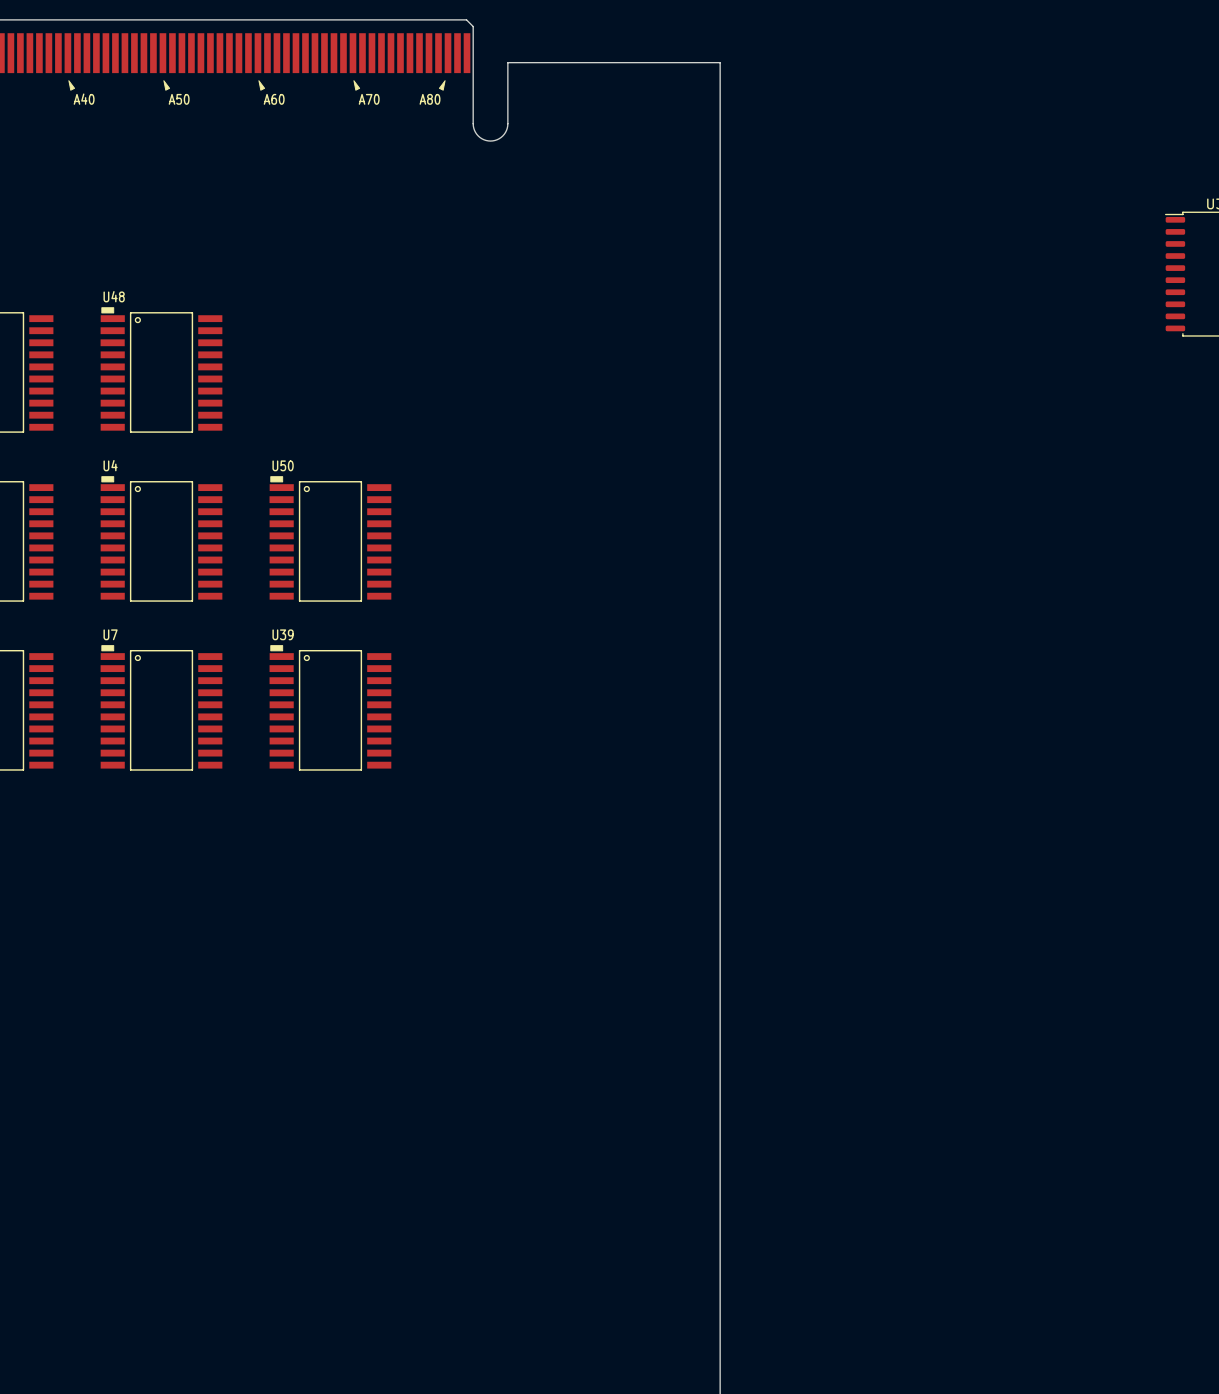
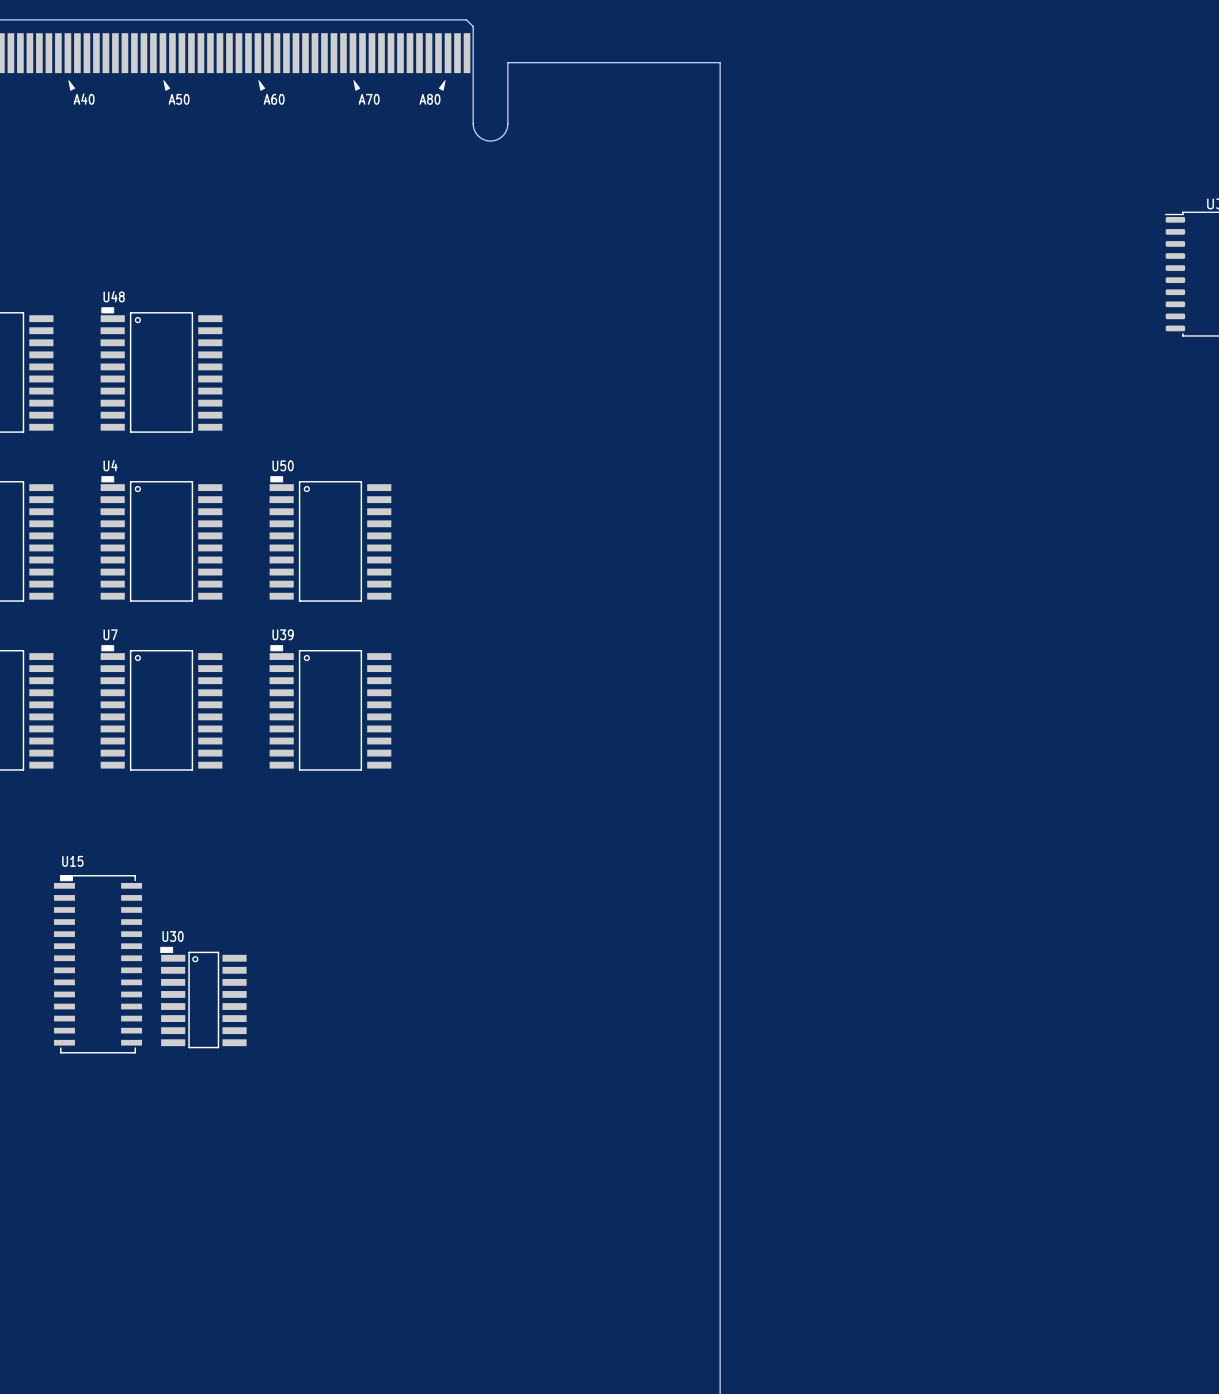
U15: none -> (98, 964)
U30: none -> (203, 997)

